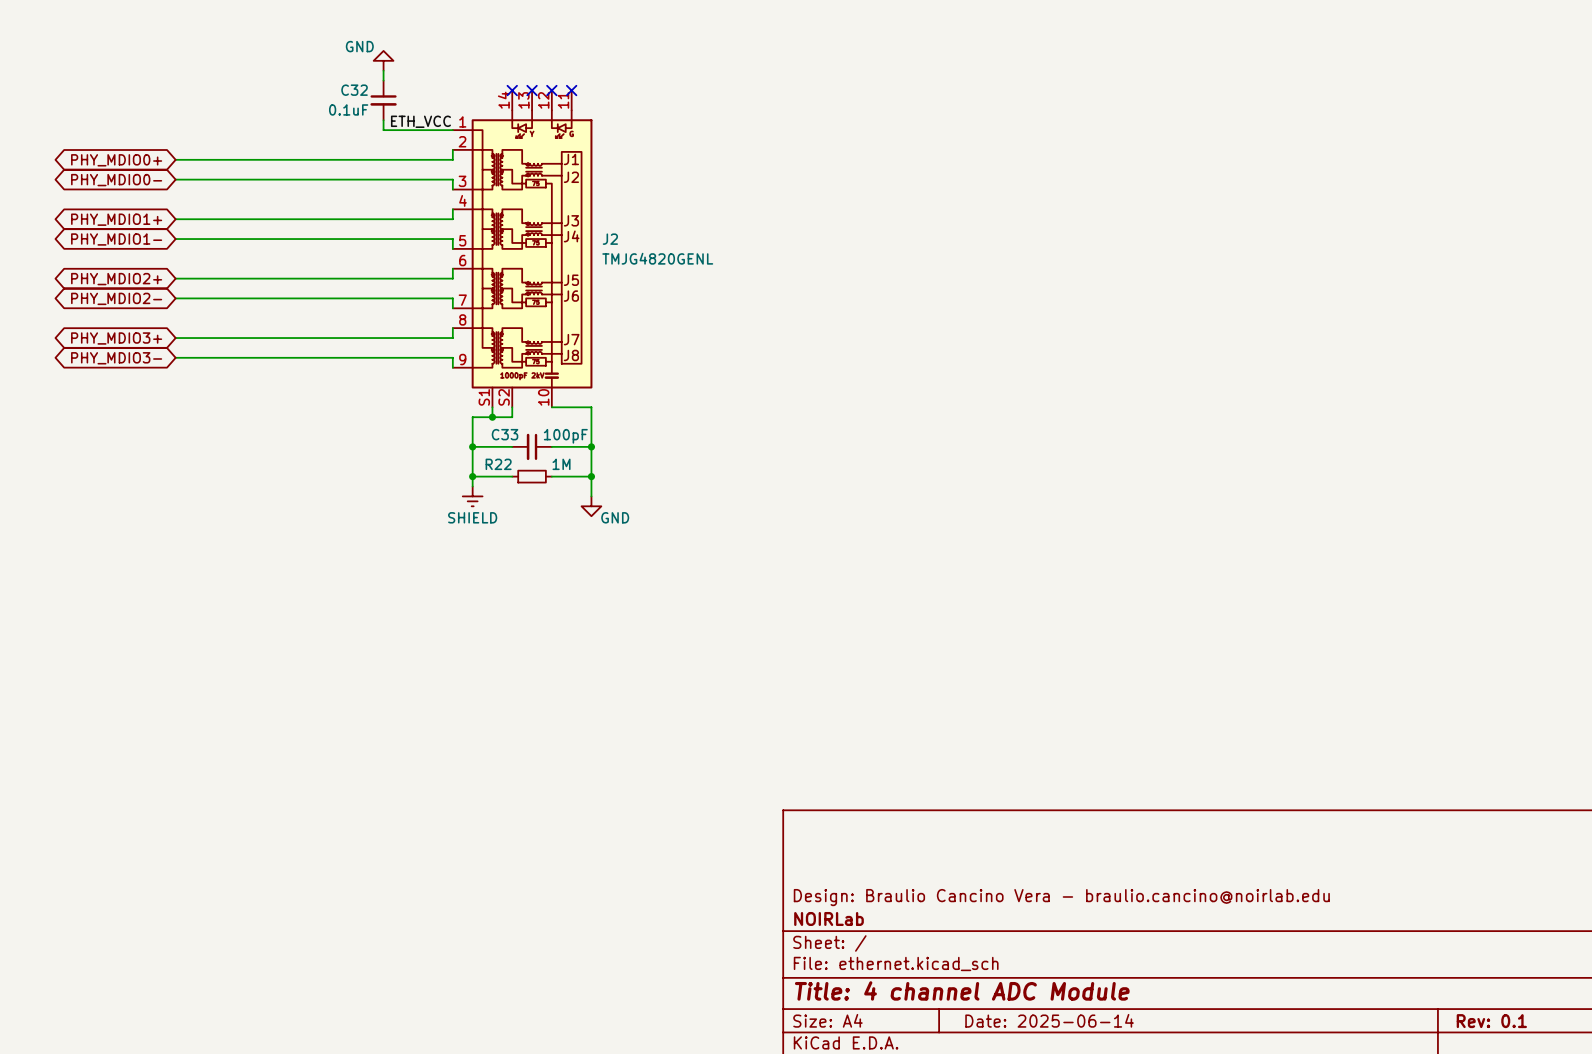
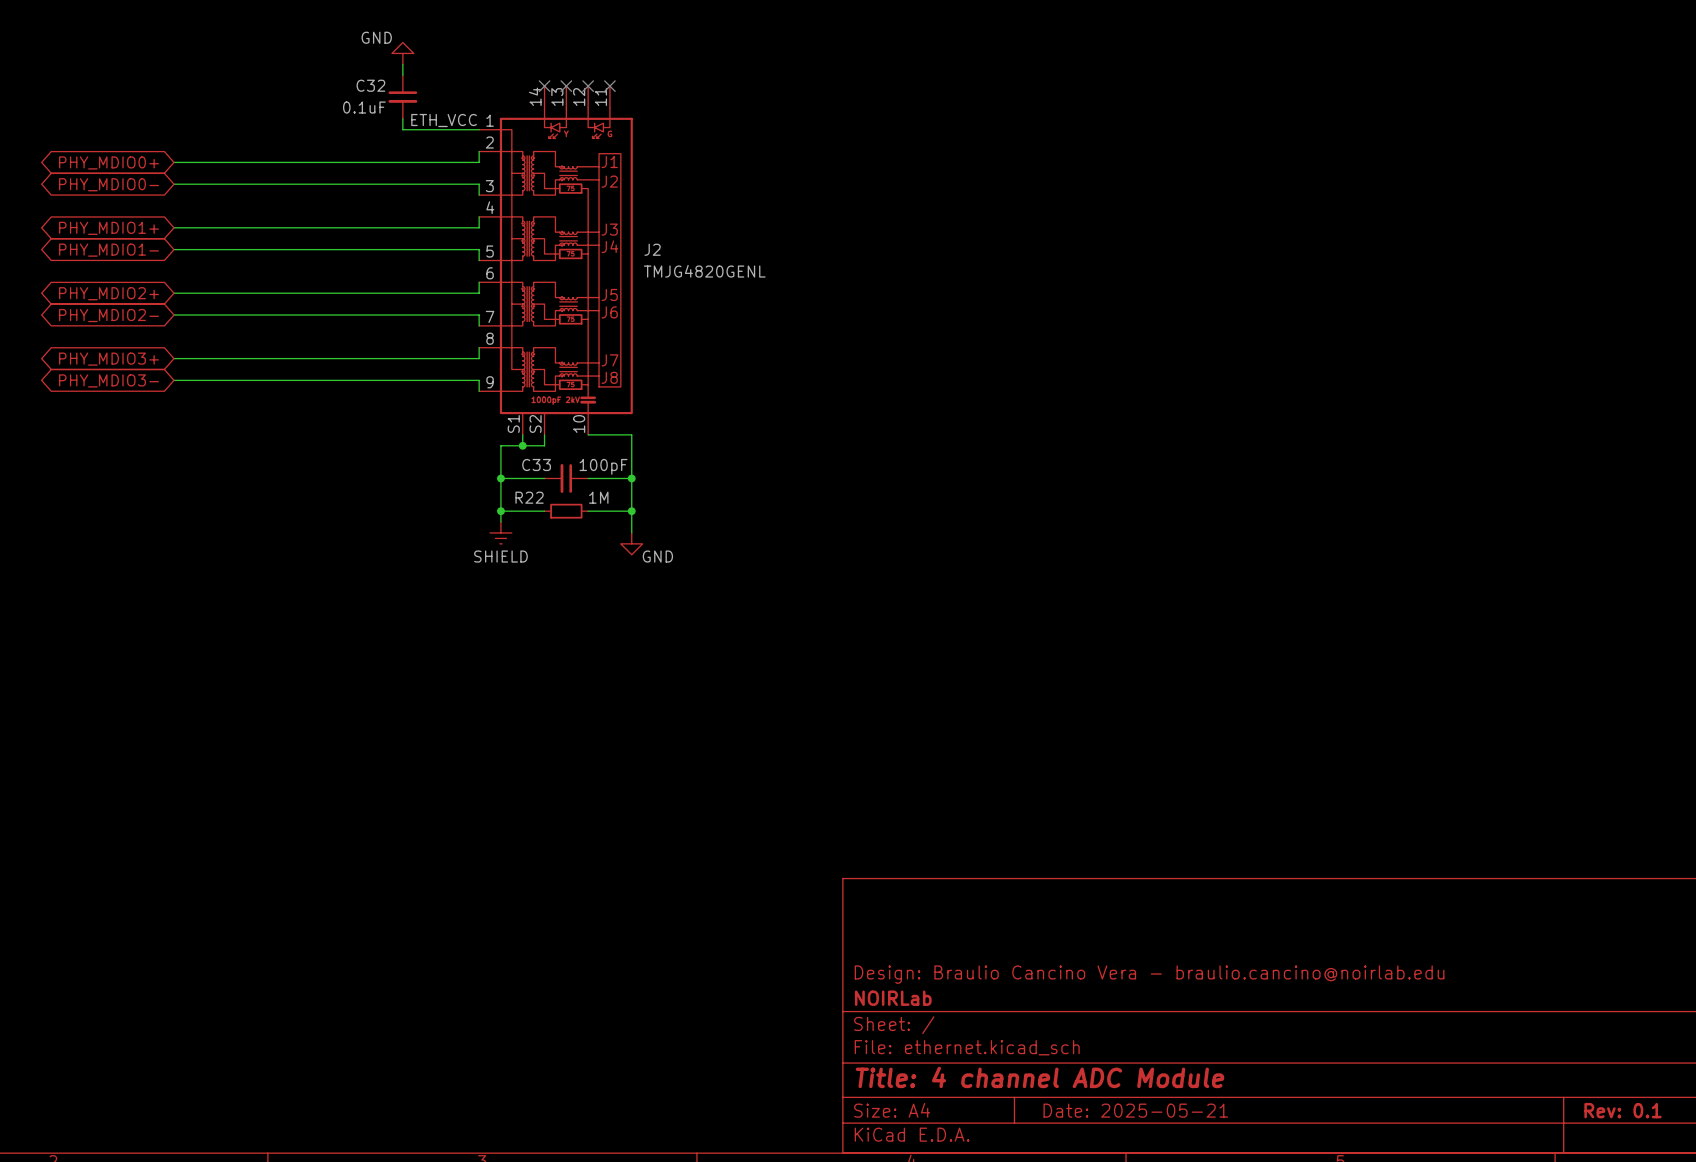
title block: Date: 2025-06-14 (1049, 1020) -> Date: 2025-05-21 (1135, 1110)

